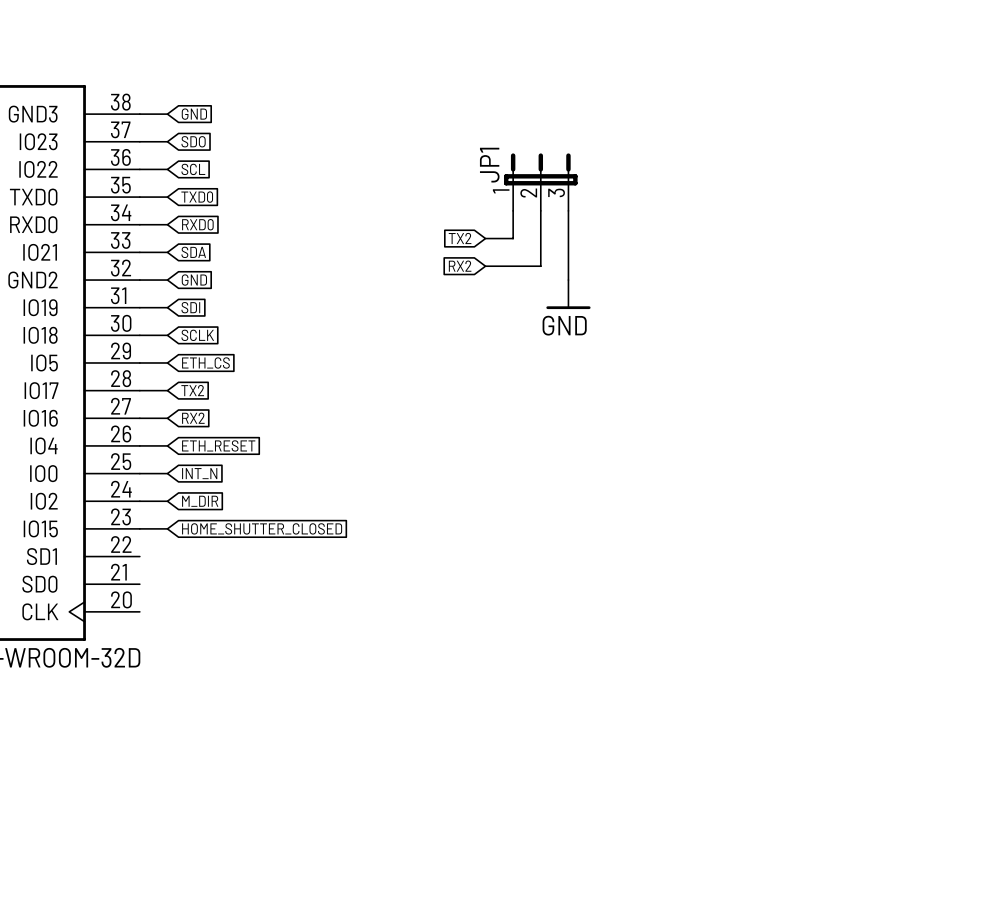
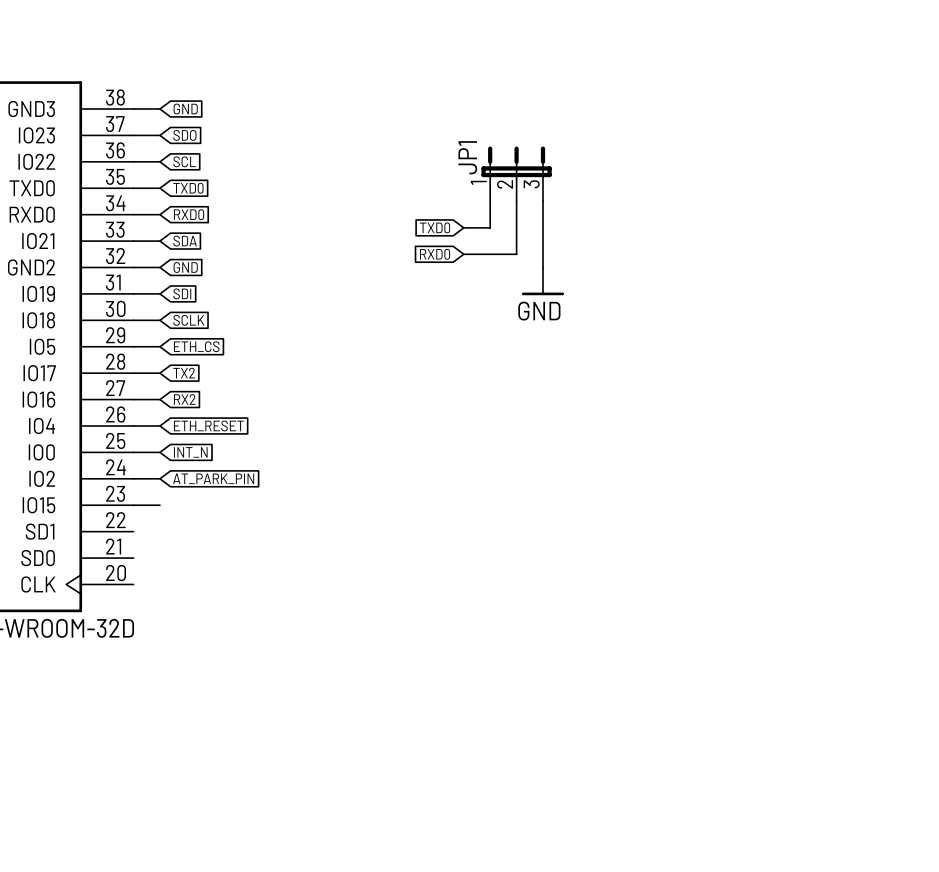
global label: TX2 (460, 238) -> TXD0 (434, 227)
global label: RX2 (460, 266) -> RXD0 (435, 254)
global label: M_DIR (200, 501) -> AT_PARK_PIN (213, 478)
global label: HOME_SHUTTER_CLOSED (262, 528) -> none

